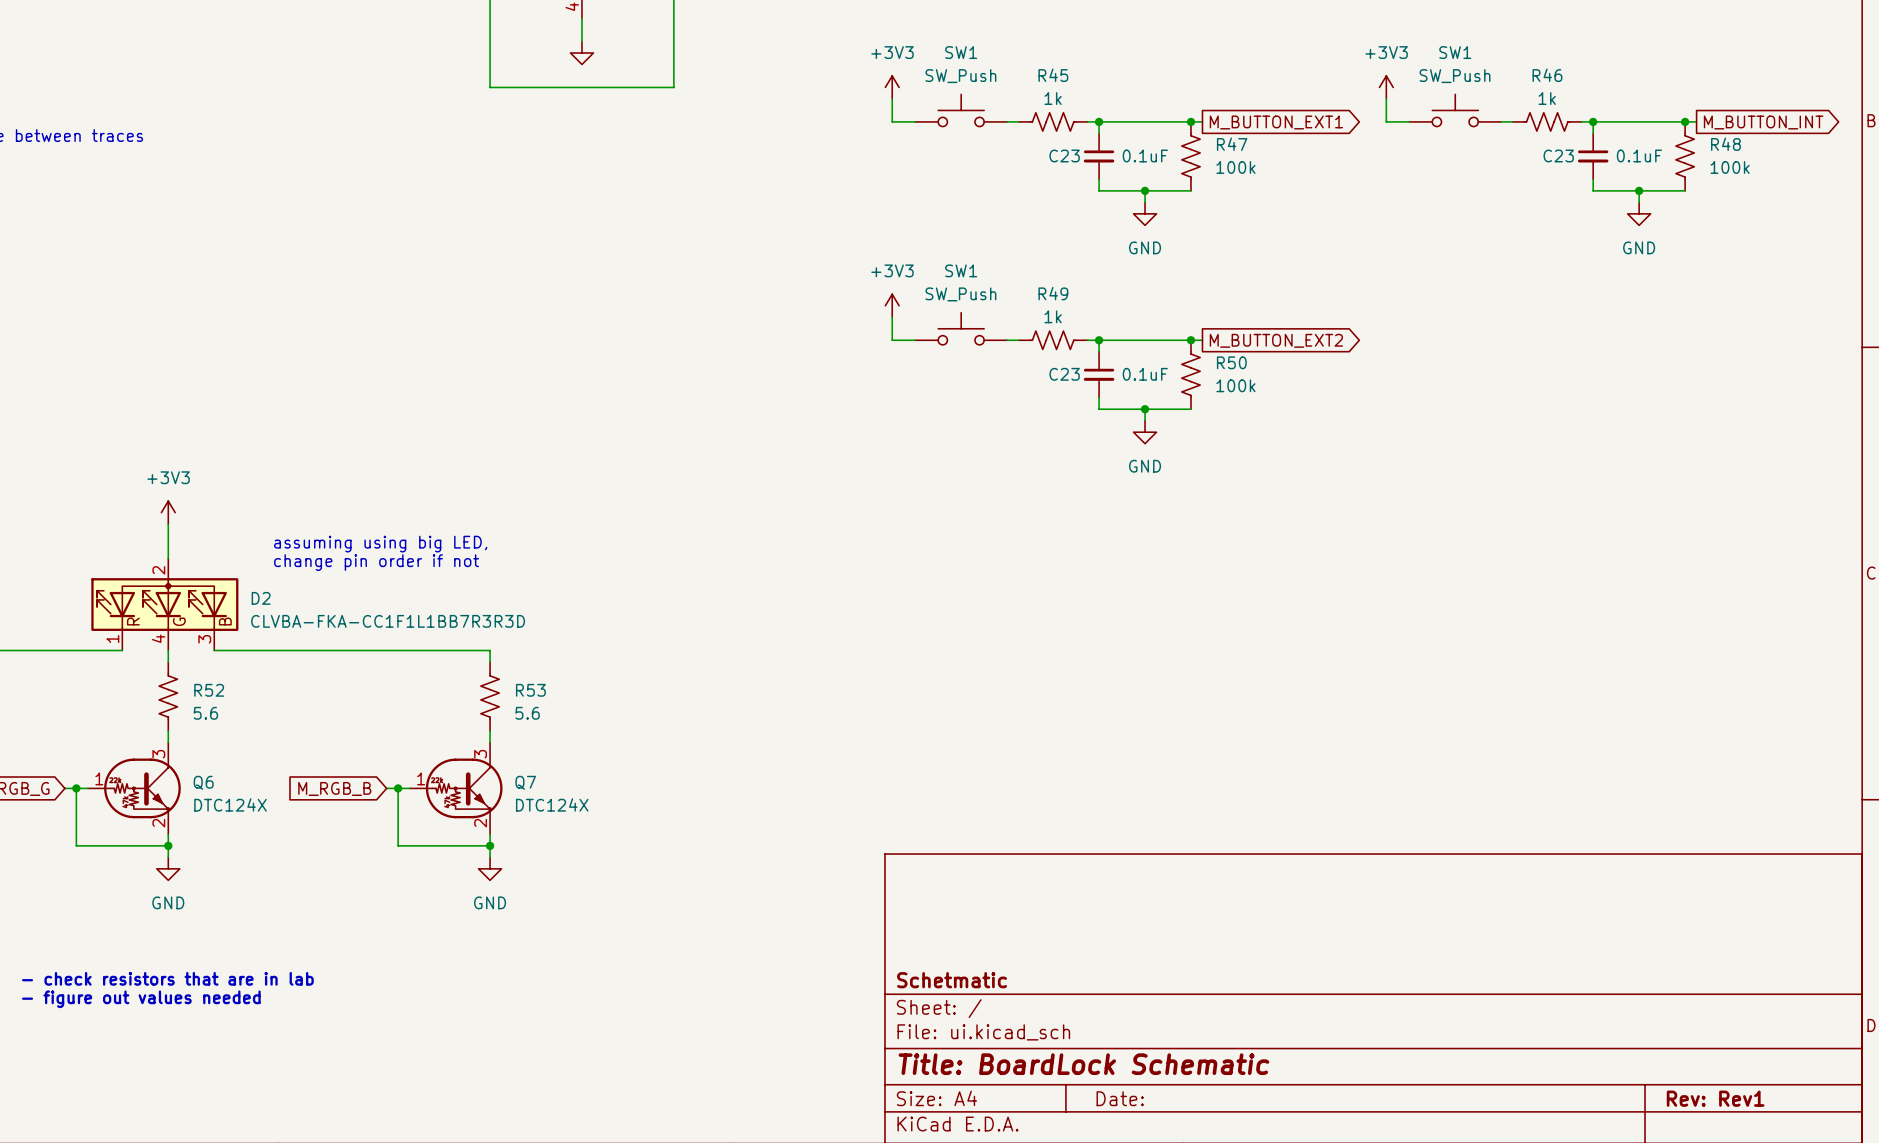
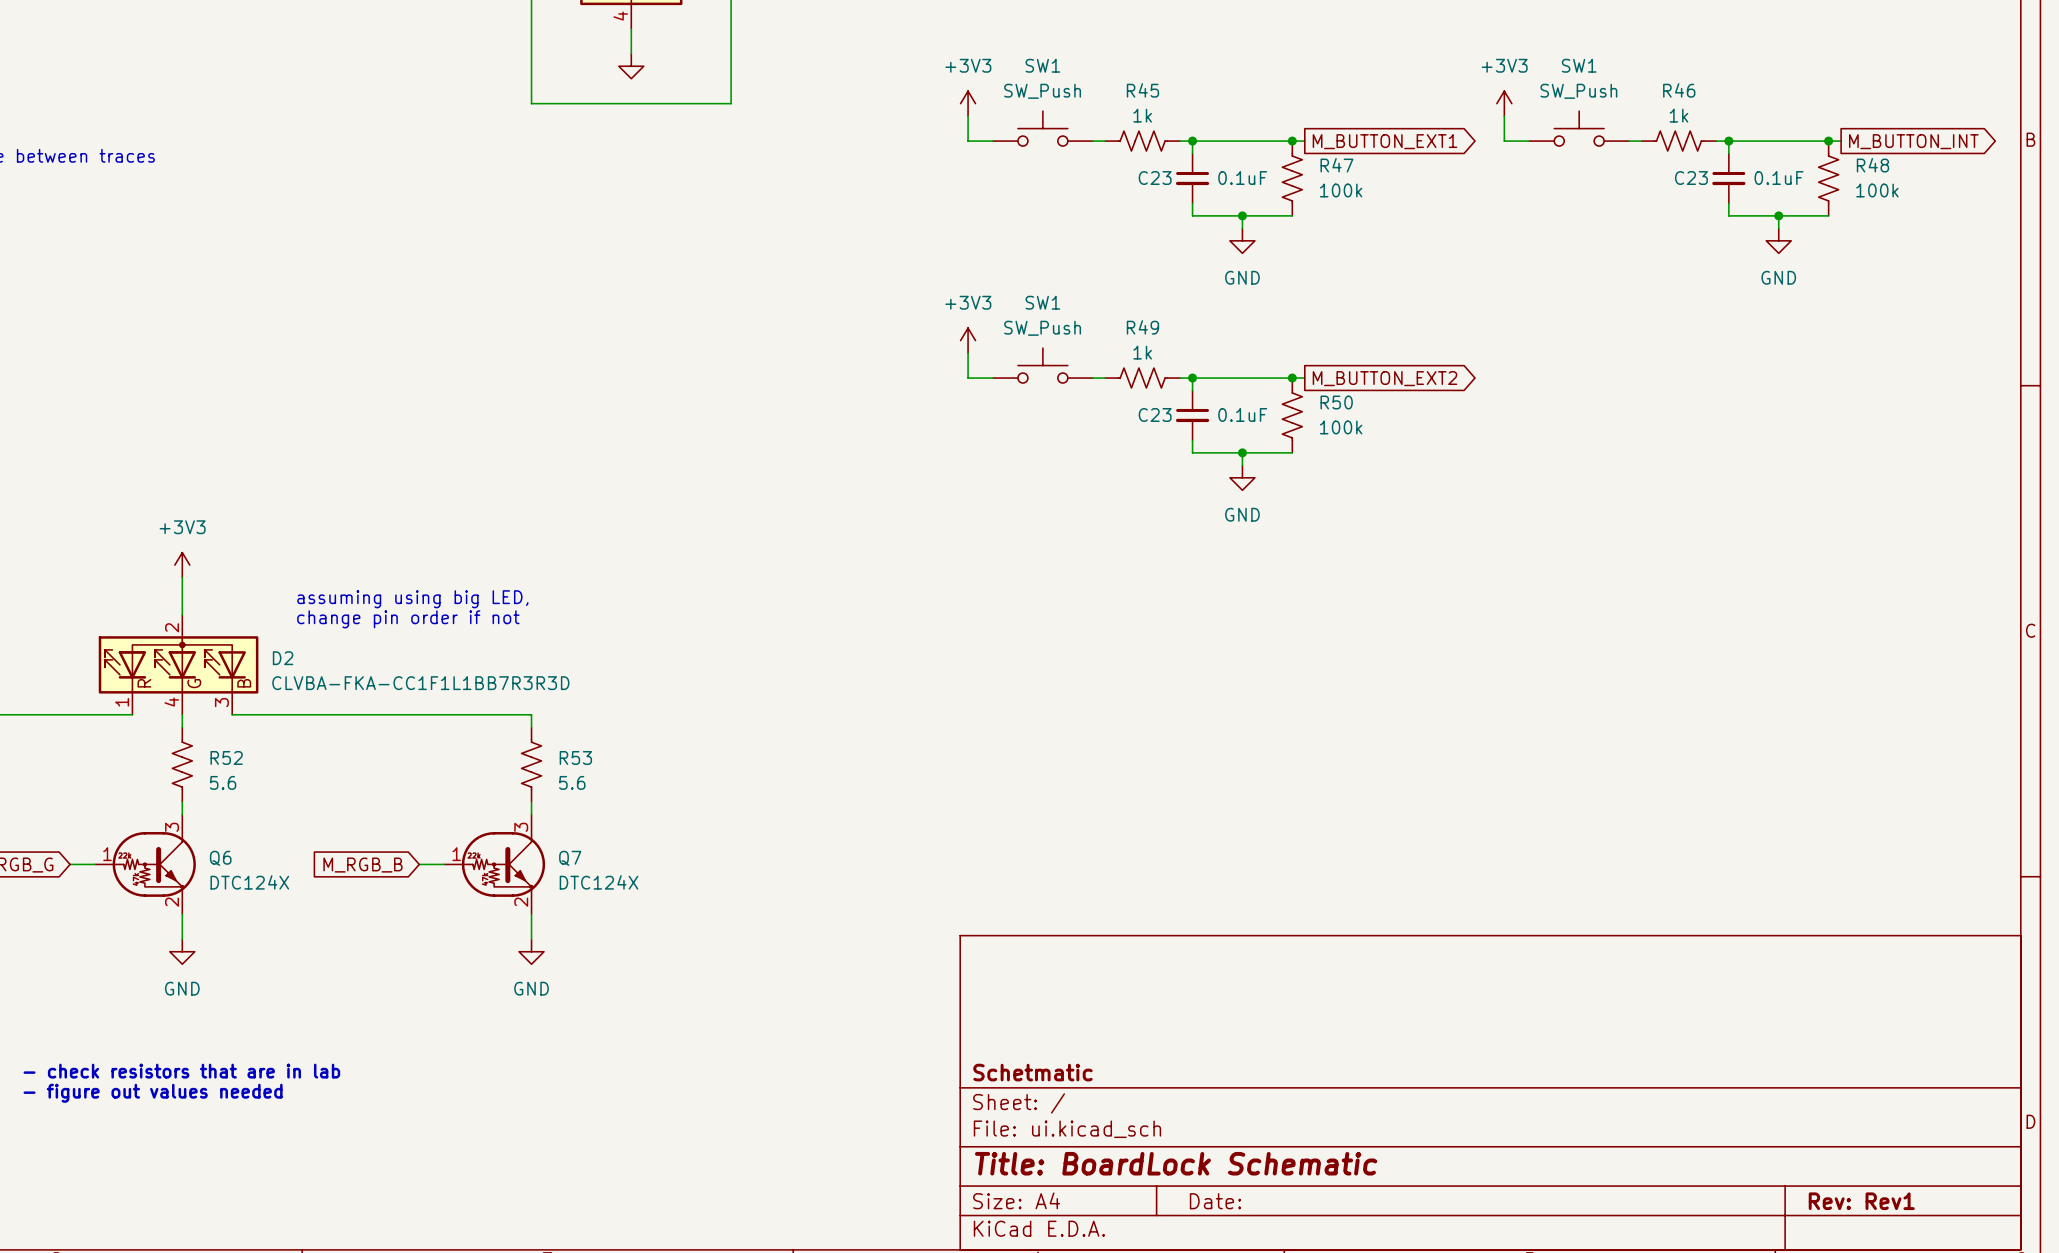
wire: (76, 788) (76, 845) (168, 845) -> none
junction: (76, 788) -> none
wire: (398, 788) (398, 845) (490, 845) -> none
junction: (398, 788) -> none
junction: (168, 845) -> none
junction: (490, 845) -> none

